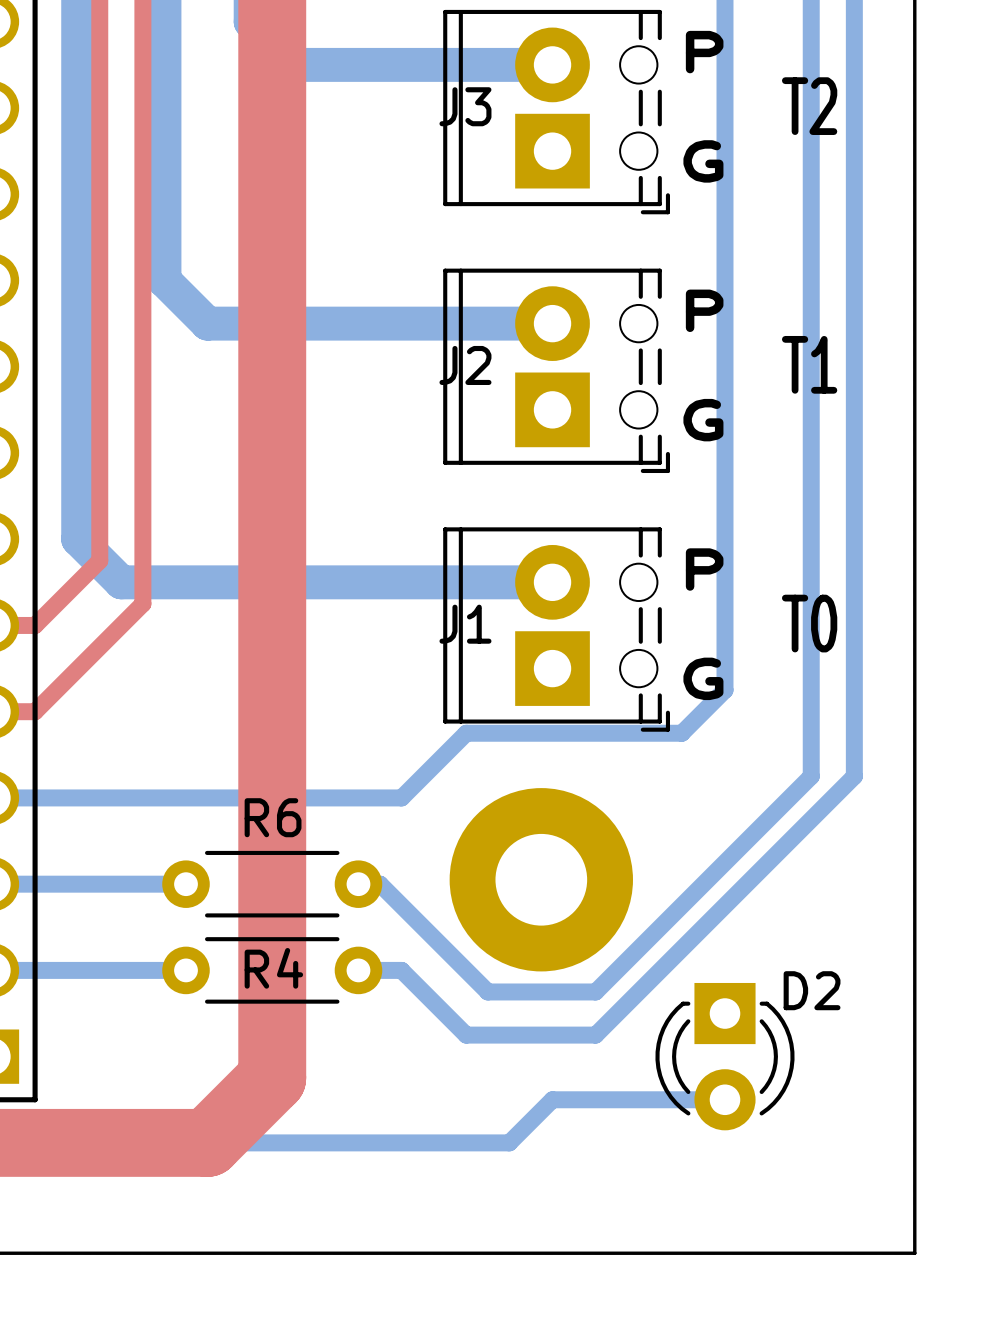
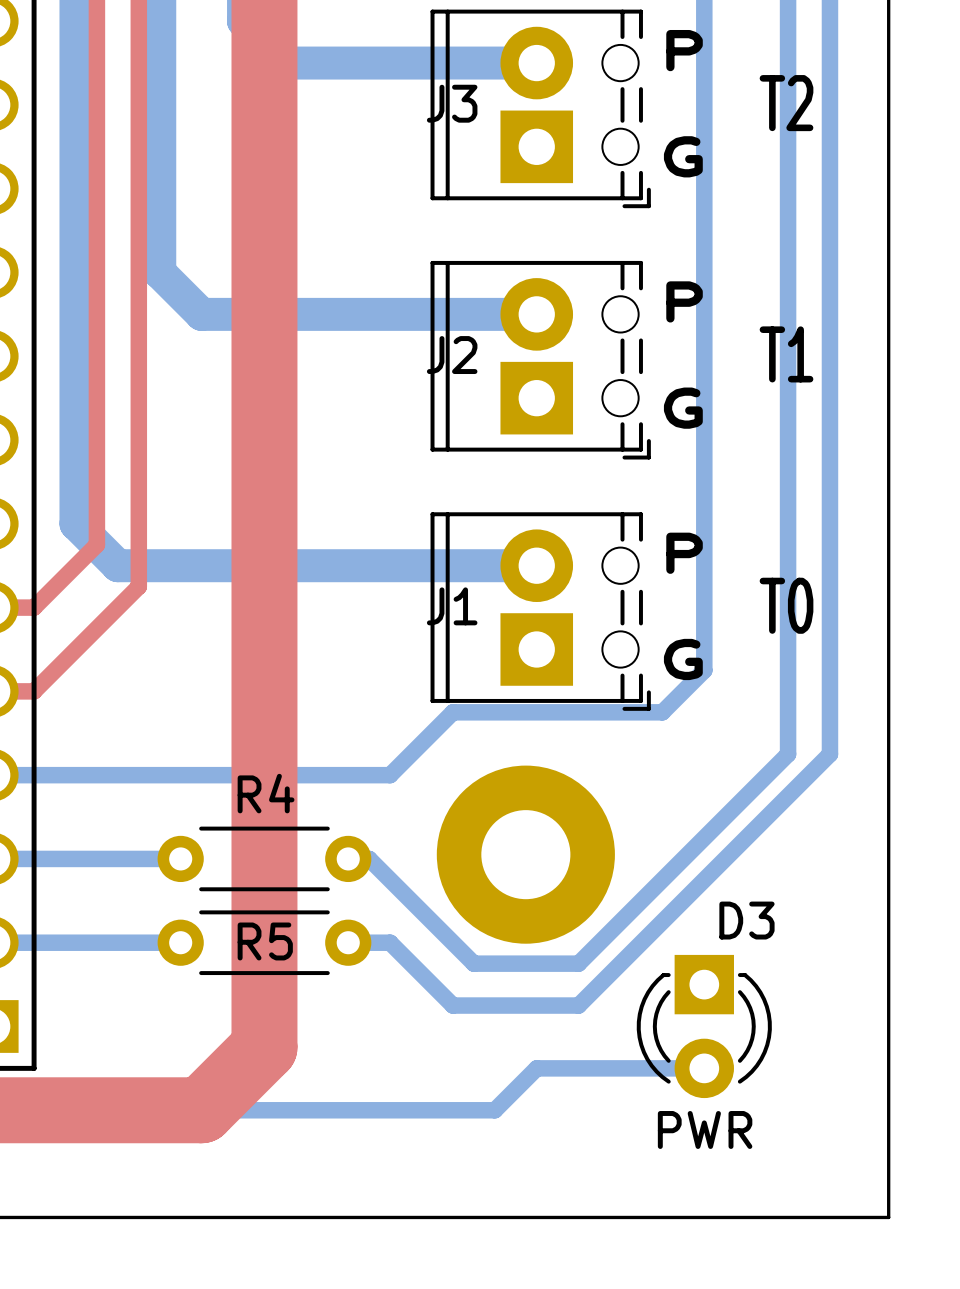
R6 name: R6 (273, 817) -> R4 (266, 793)
R4 name: R4 (273, 968) -> R5 (265, 941)
D2 name: D2 (812, 990) -> D3 (746, 920)
D2 value: none -> PWR (705, 1129)

